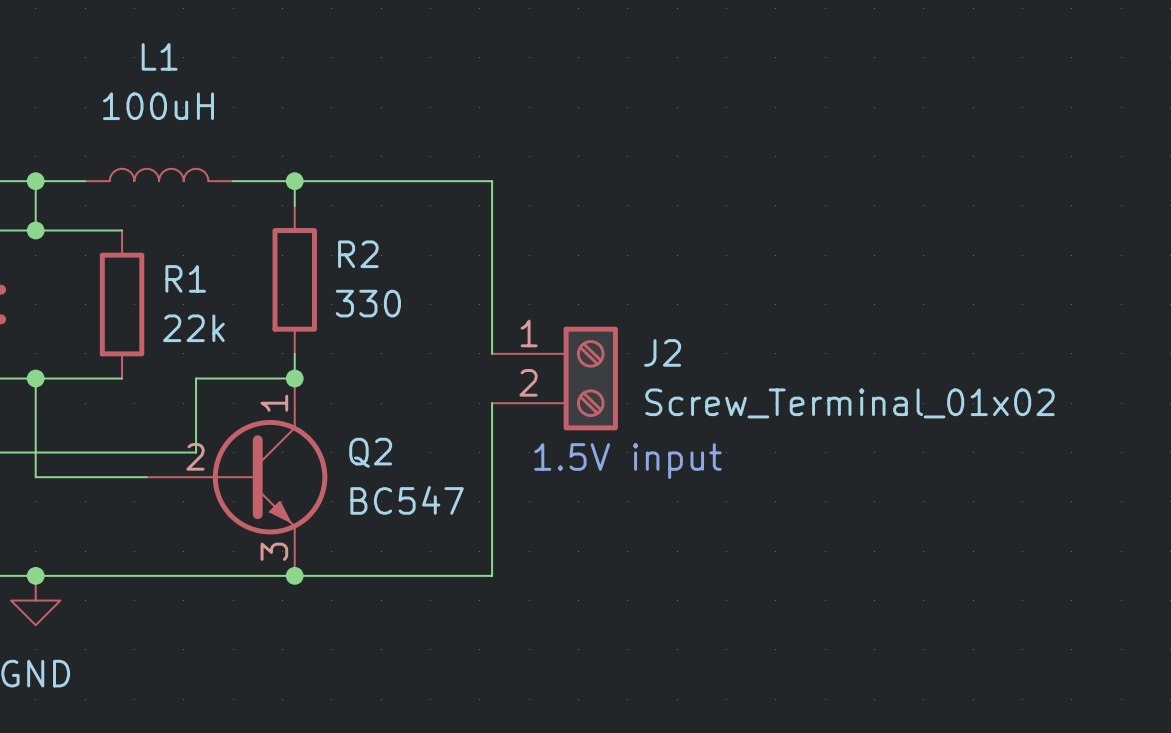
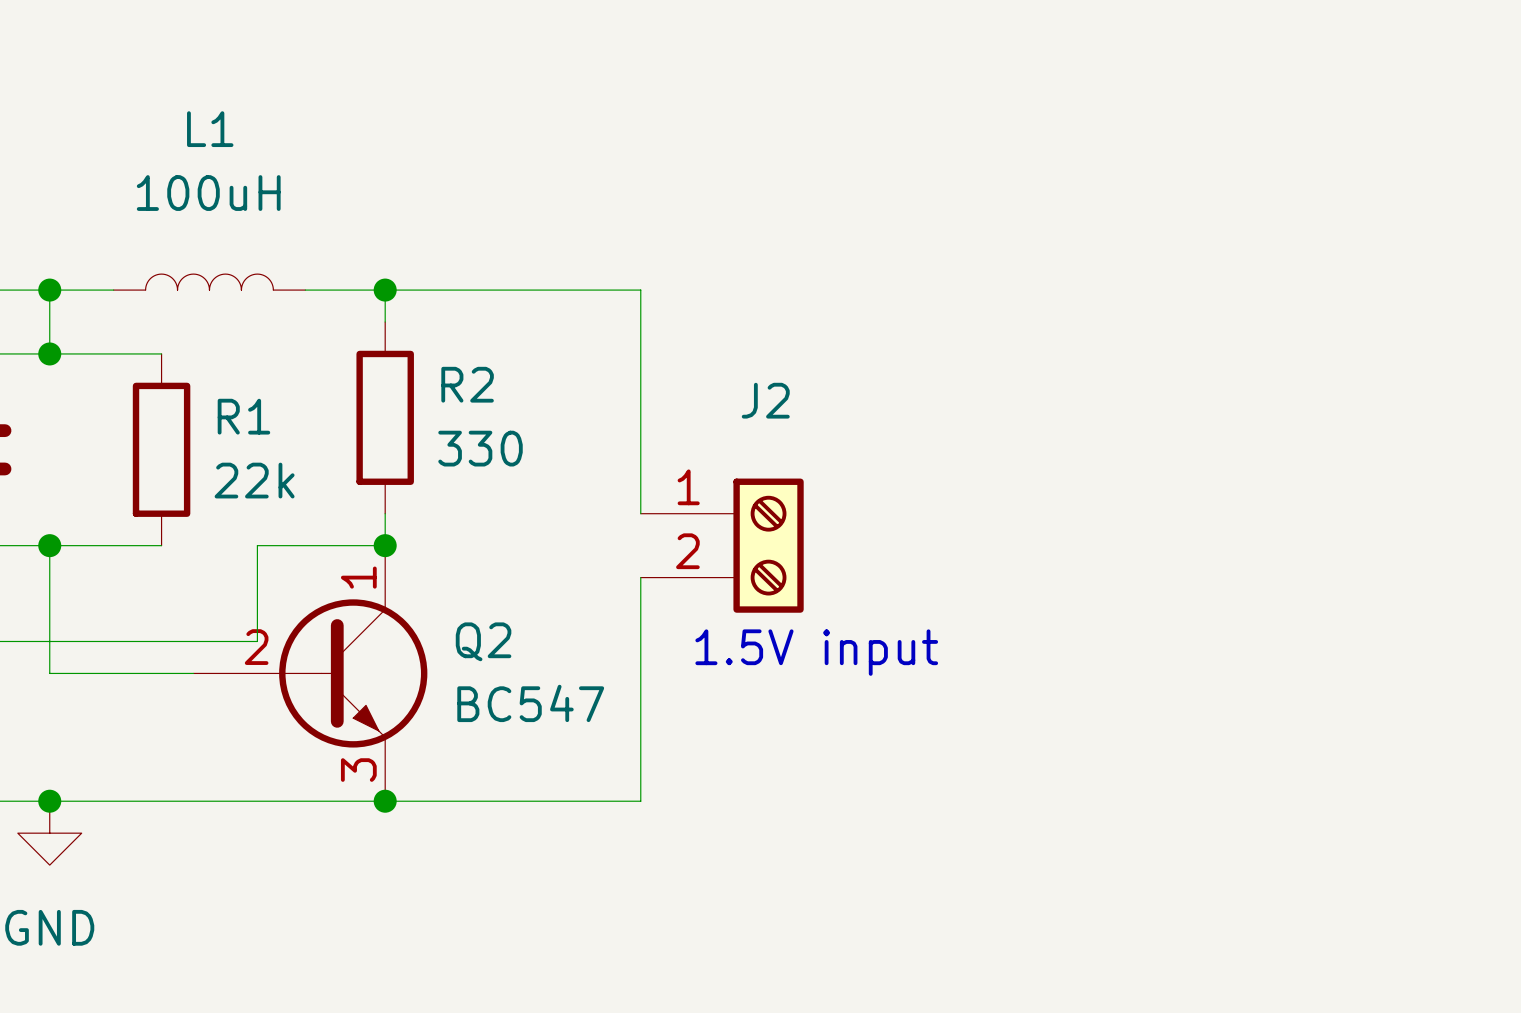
J2 name position: J2 (662, 352) -> J2 (765, 400)
J2 value: Screw_Terminal_01x02 (849, 403) -> none

